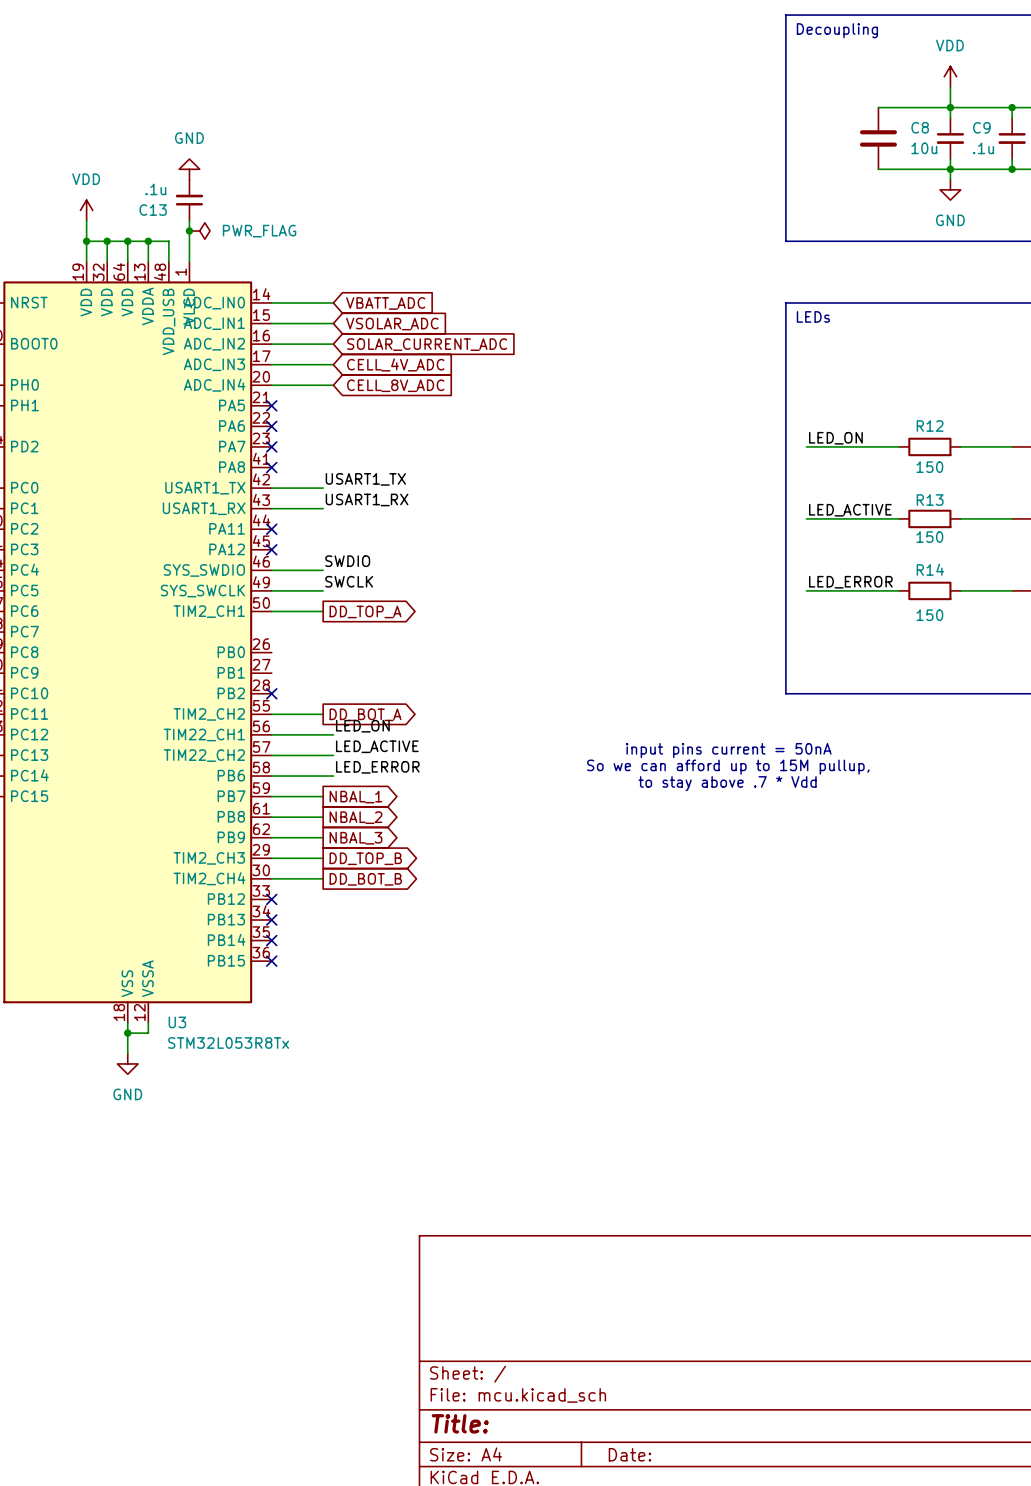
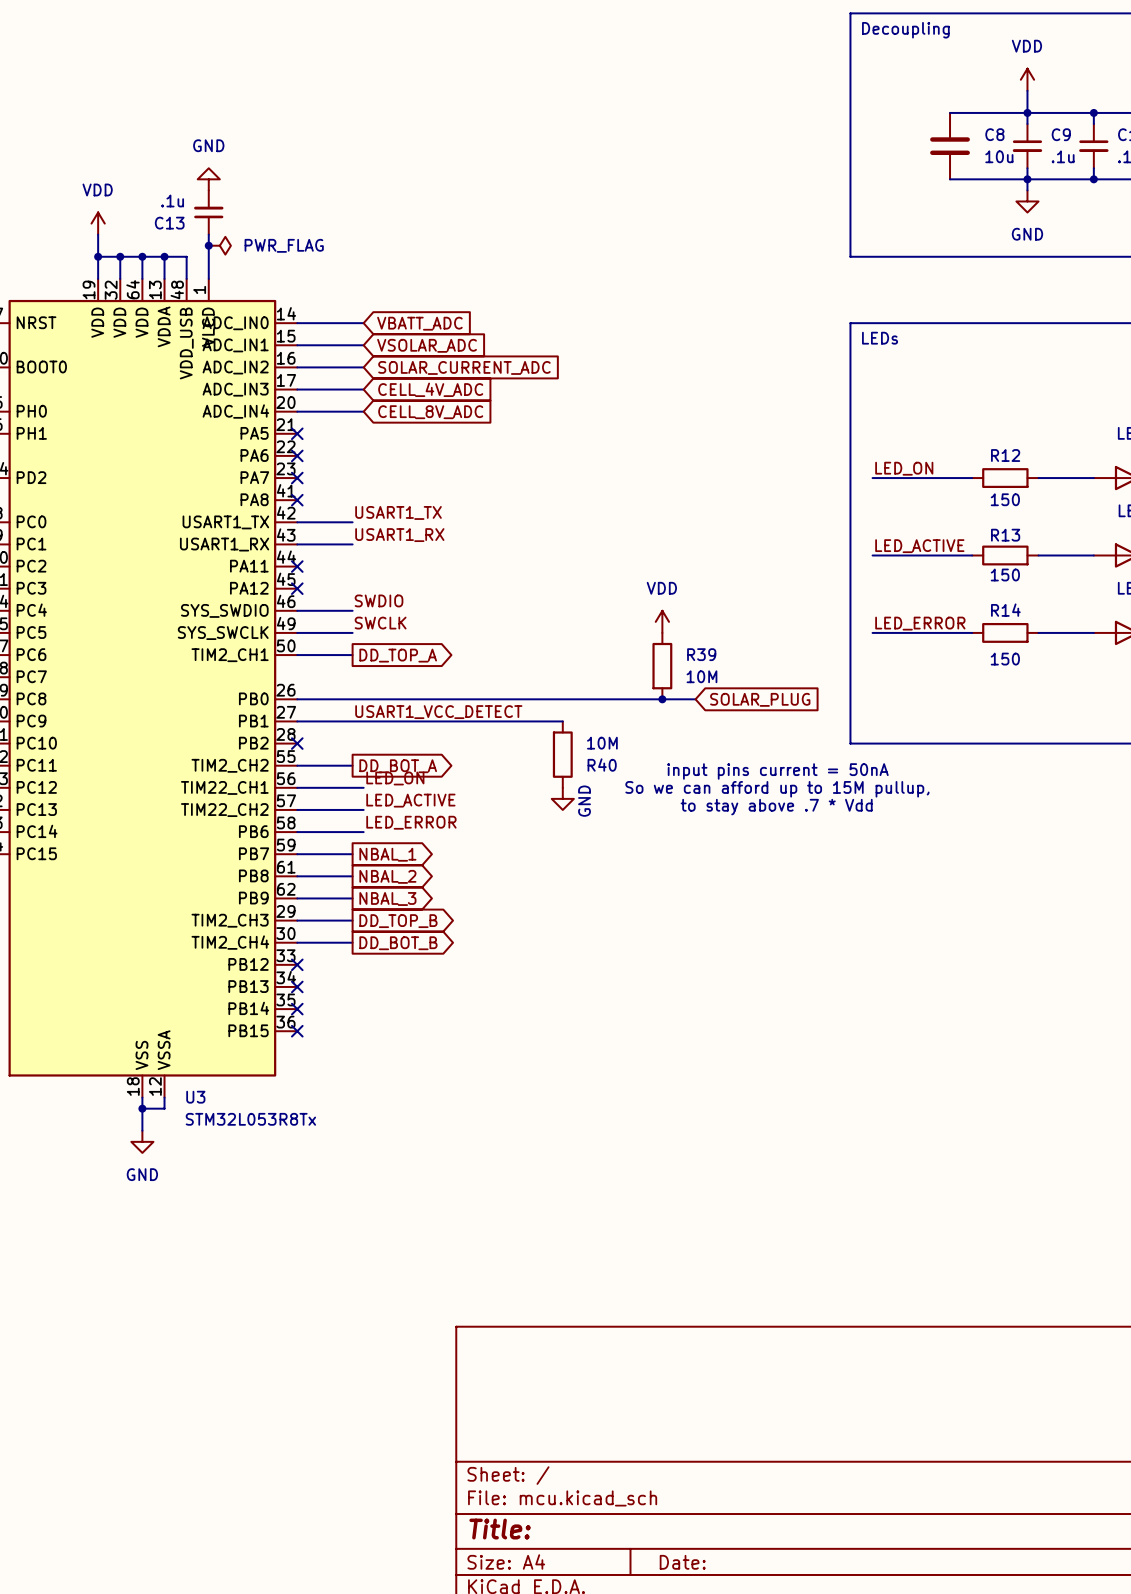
power symbol: none -> VDD (662, 621)
R39: none -> 10M (662, 666)
wire: none -> (297, 699) (695, 699)
junction: none -> (662, 699)
global label: none -> SOLAR_PLUG (760, 699)
label: none -> USART1_VCC_DETECT (438, 712)
wire: none -> (297, 721) (562, 721)
R40: none -> 10M (562, 754)
power symbol: none -> GND (562, 798)
text position: input pins current = 50nA (728, 750) -> input pins current = 50nA (777, 771)
text position: So we can afford up to 15M pullup, (728, 767) -> So we can afford up to 15M pullup, (777, 789)
text position: to stay above .7 * Vdd (727, 783) -> to stay above .7 * Vdd (776, 807)

